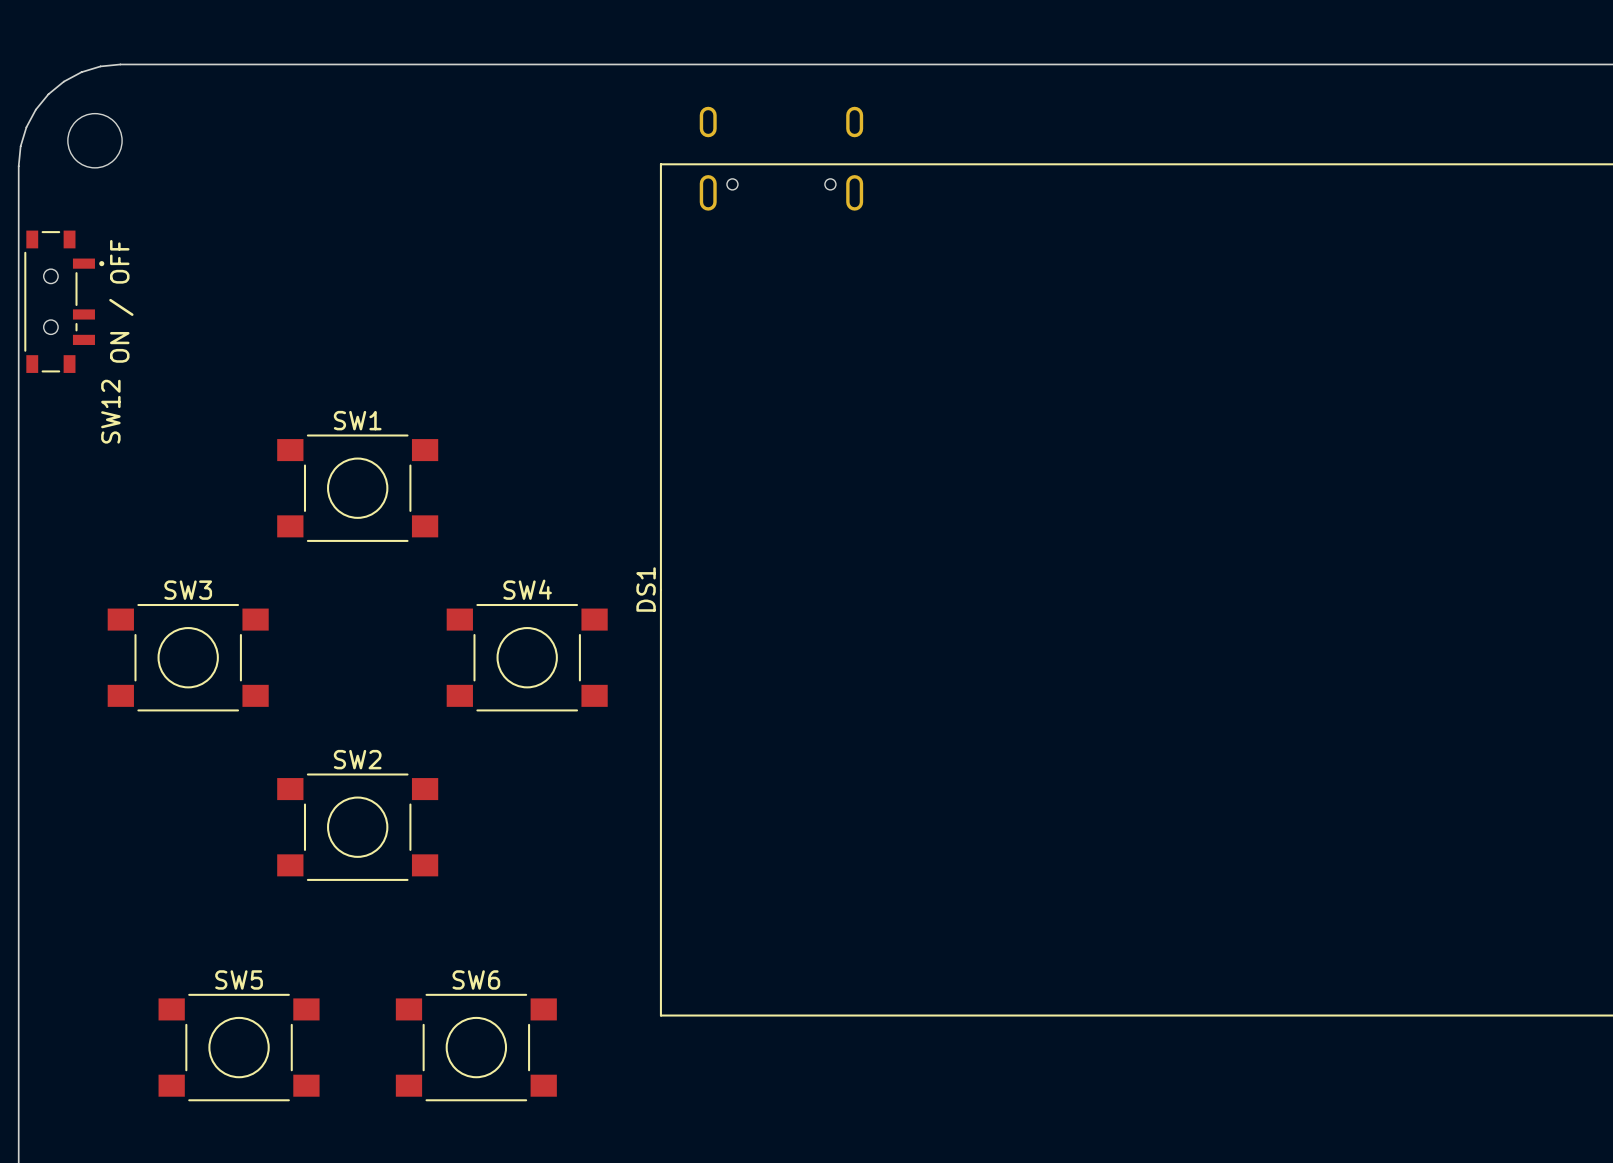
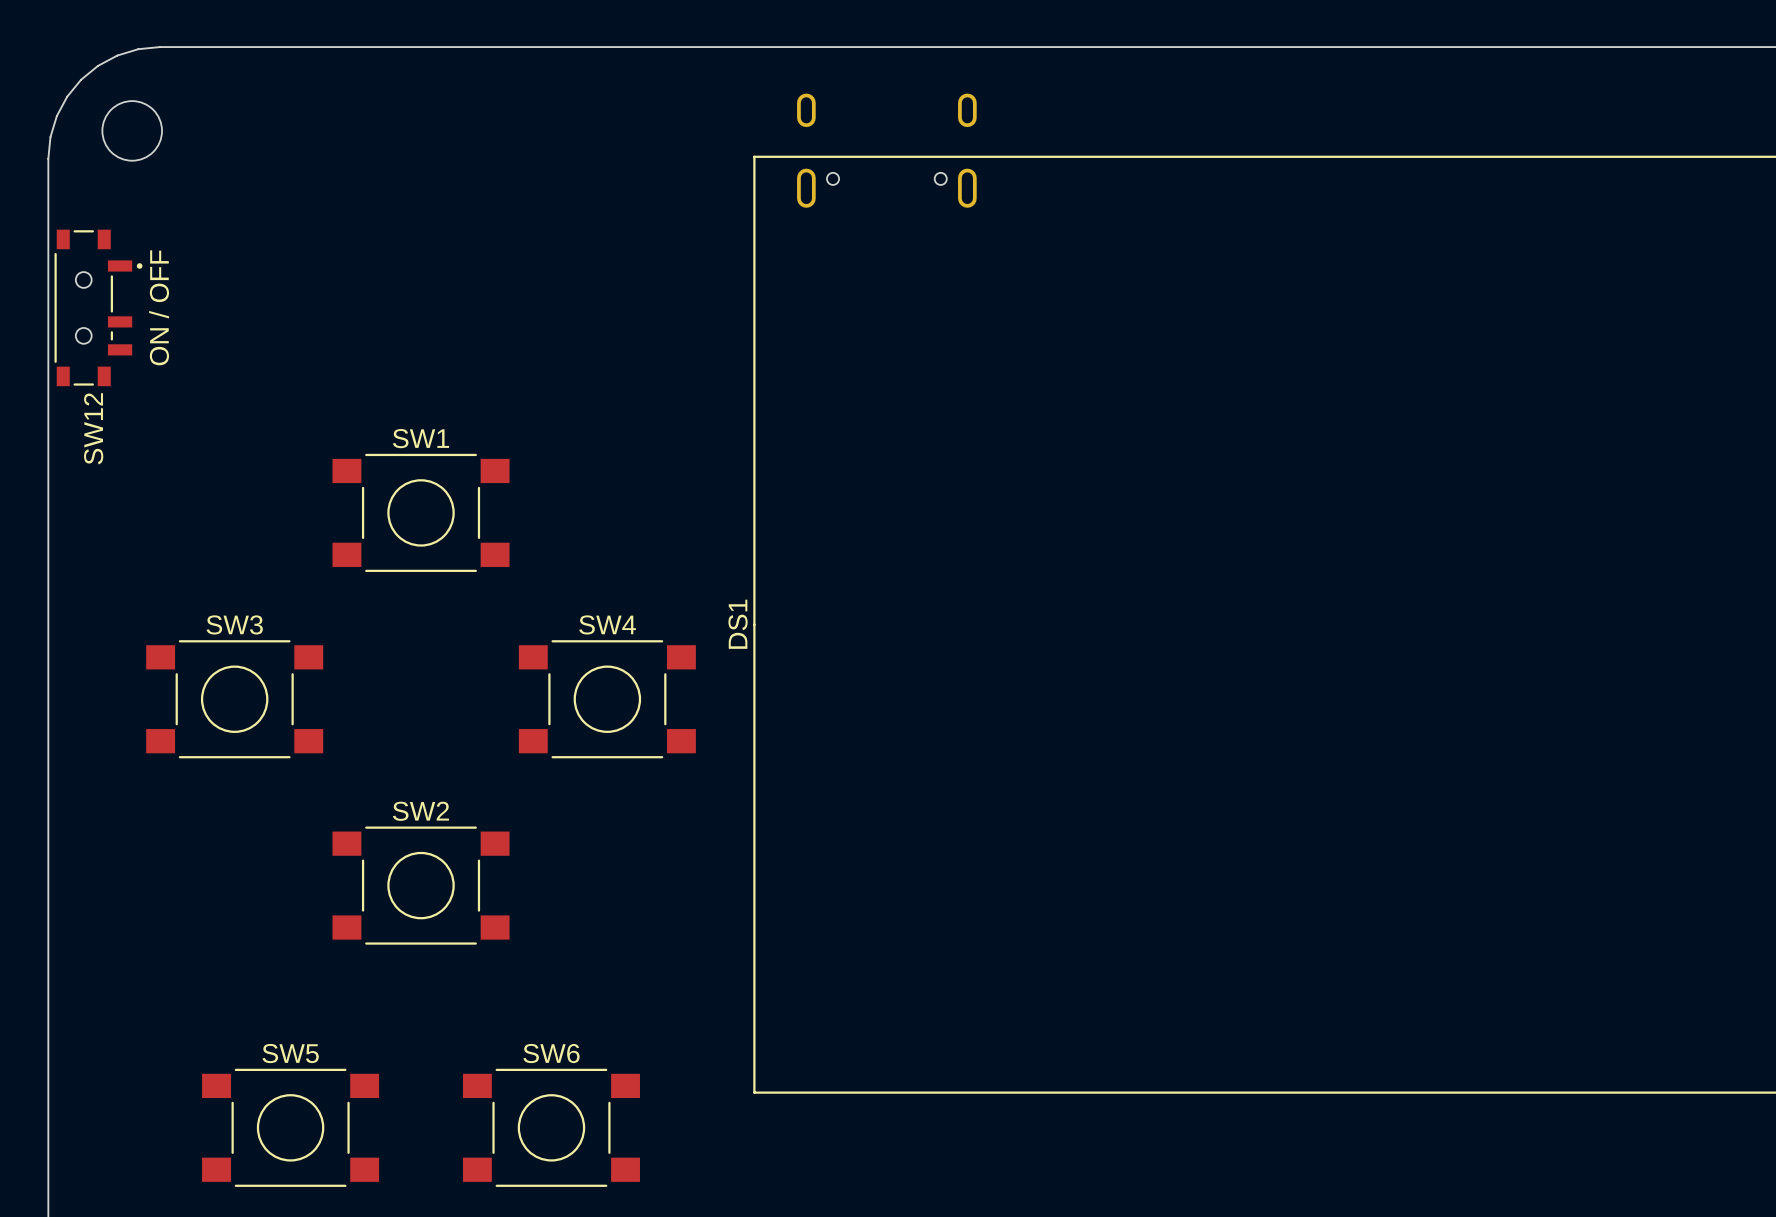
SW12 name position: SW12 (110, 411) -> SW12 (93, 428)

